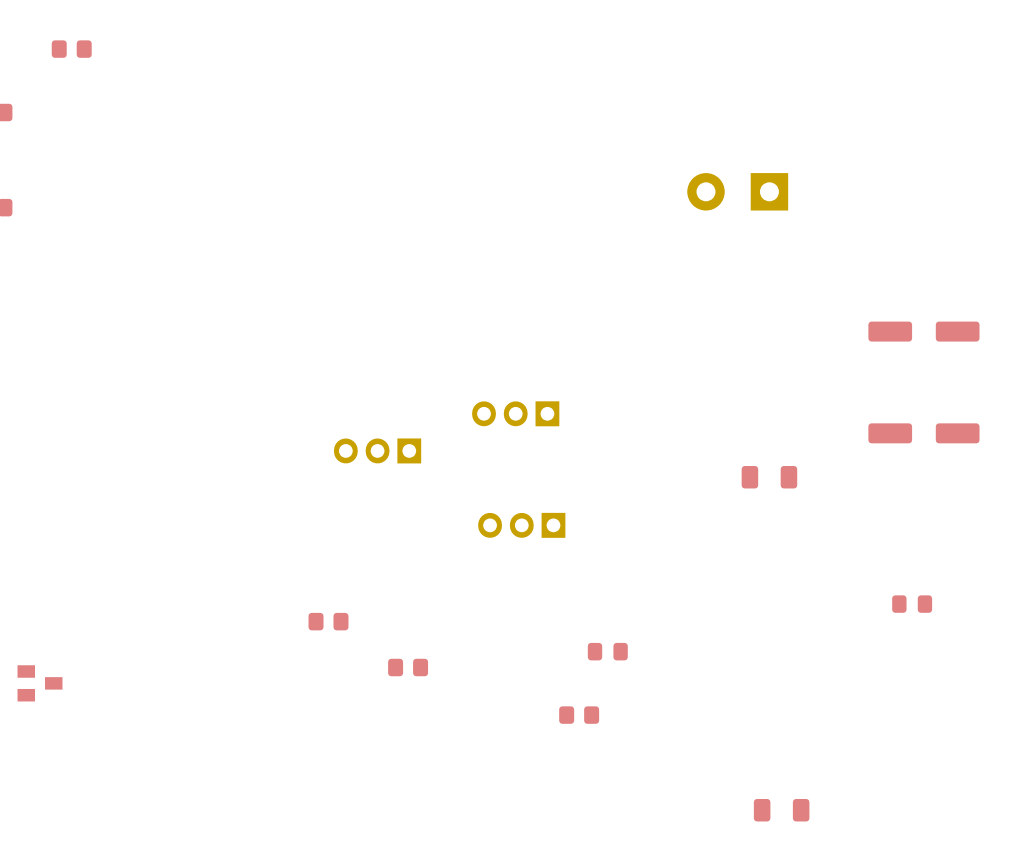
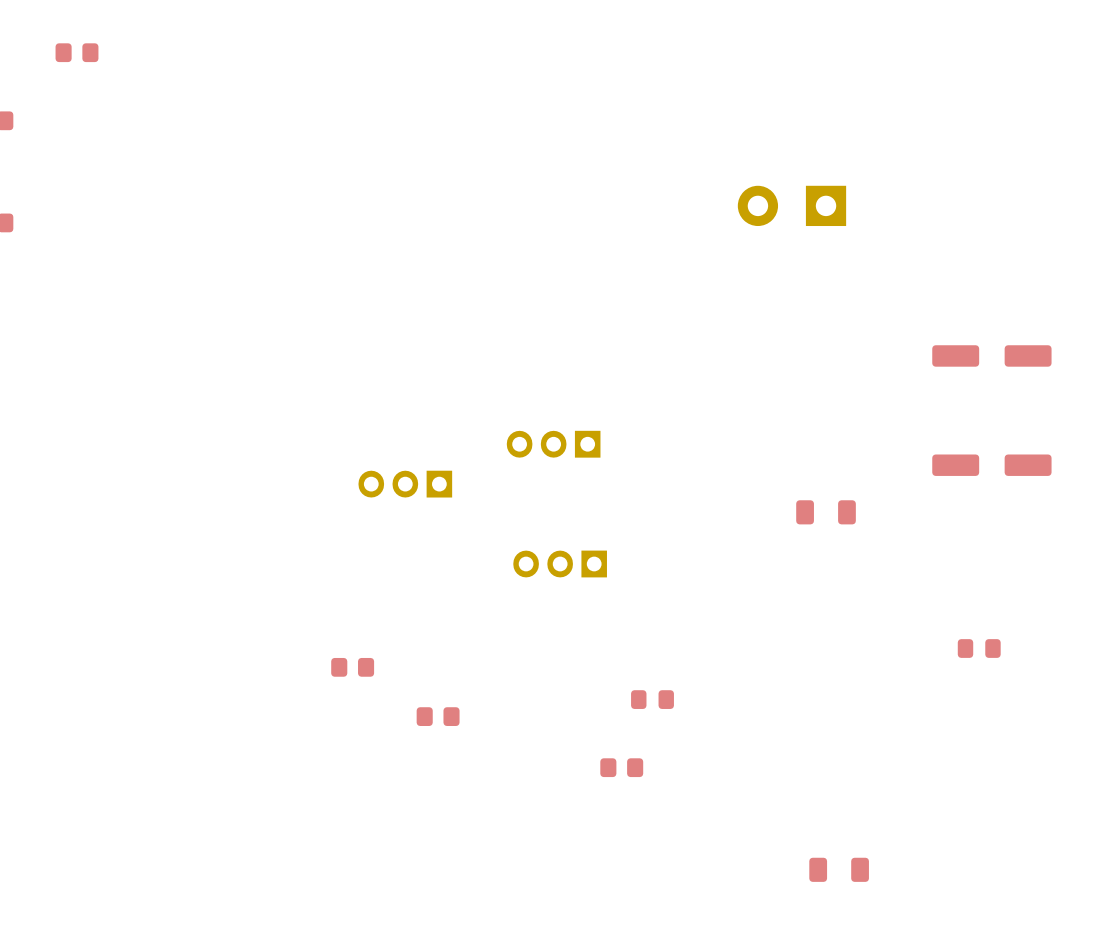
part: (40, 683) -> none

